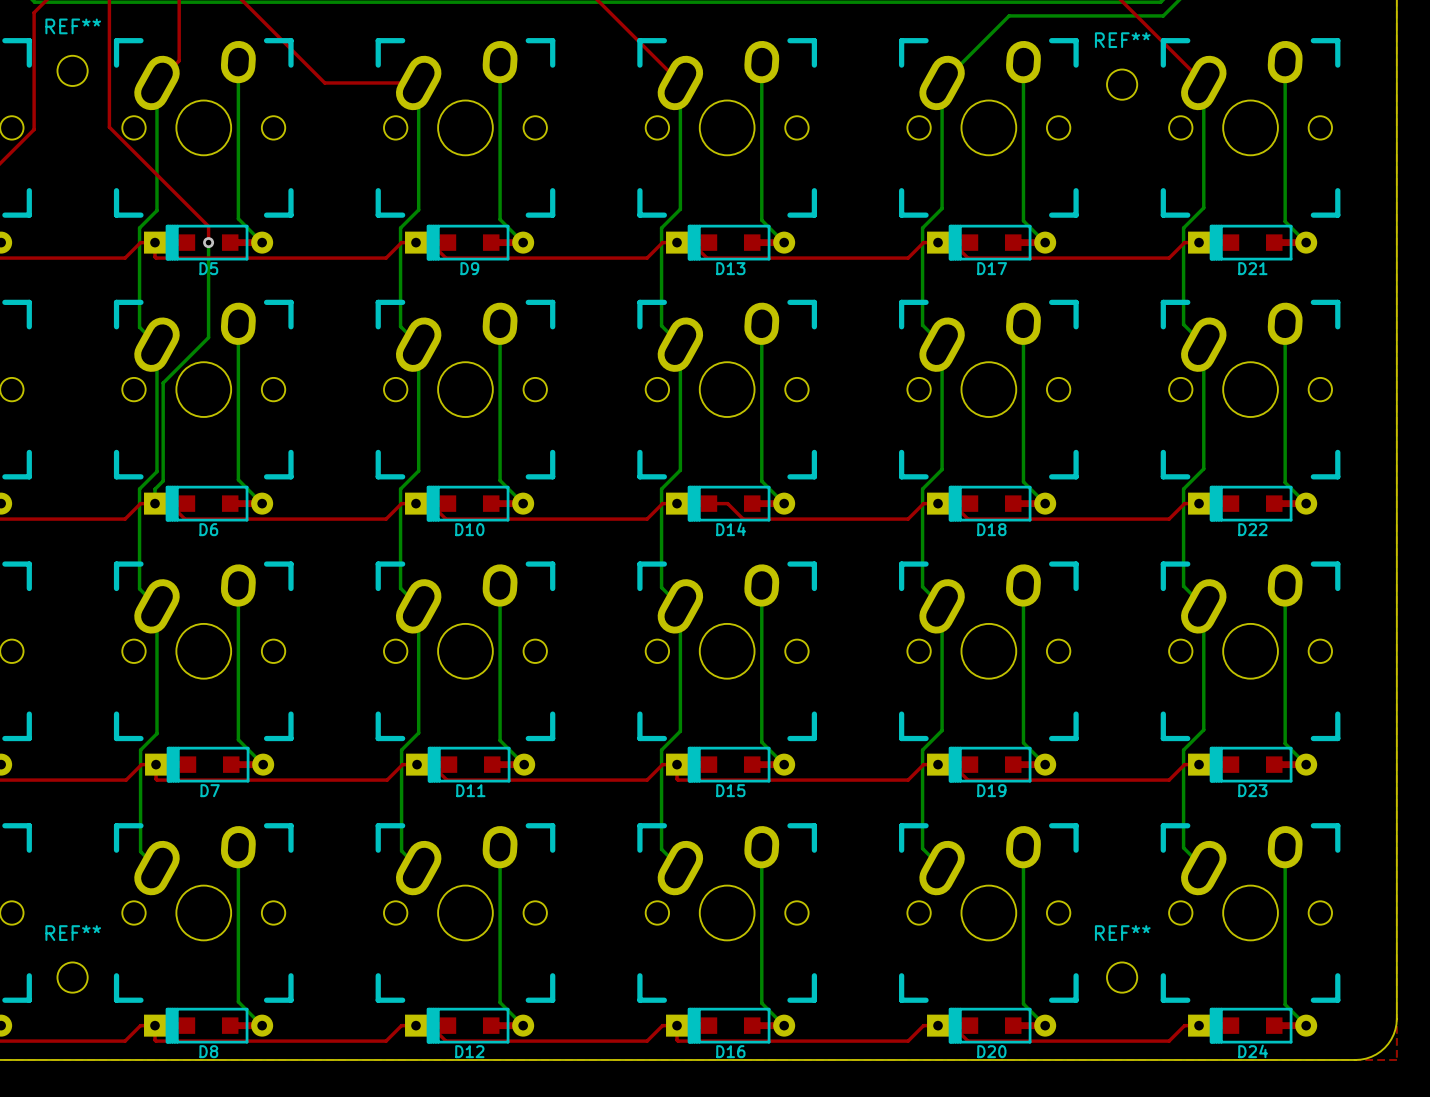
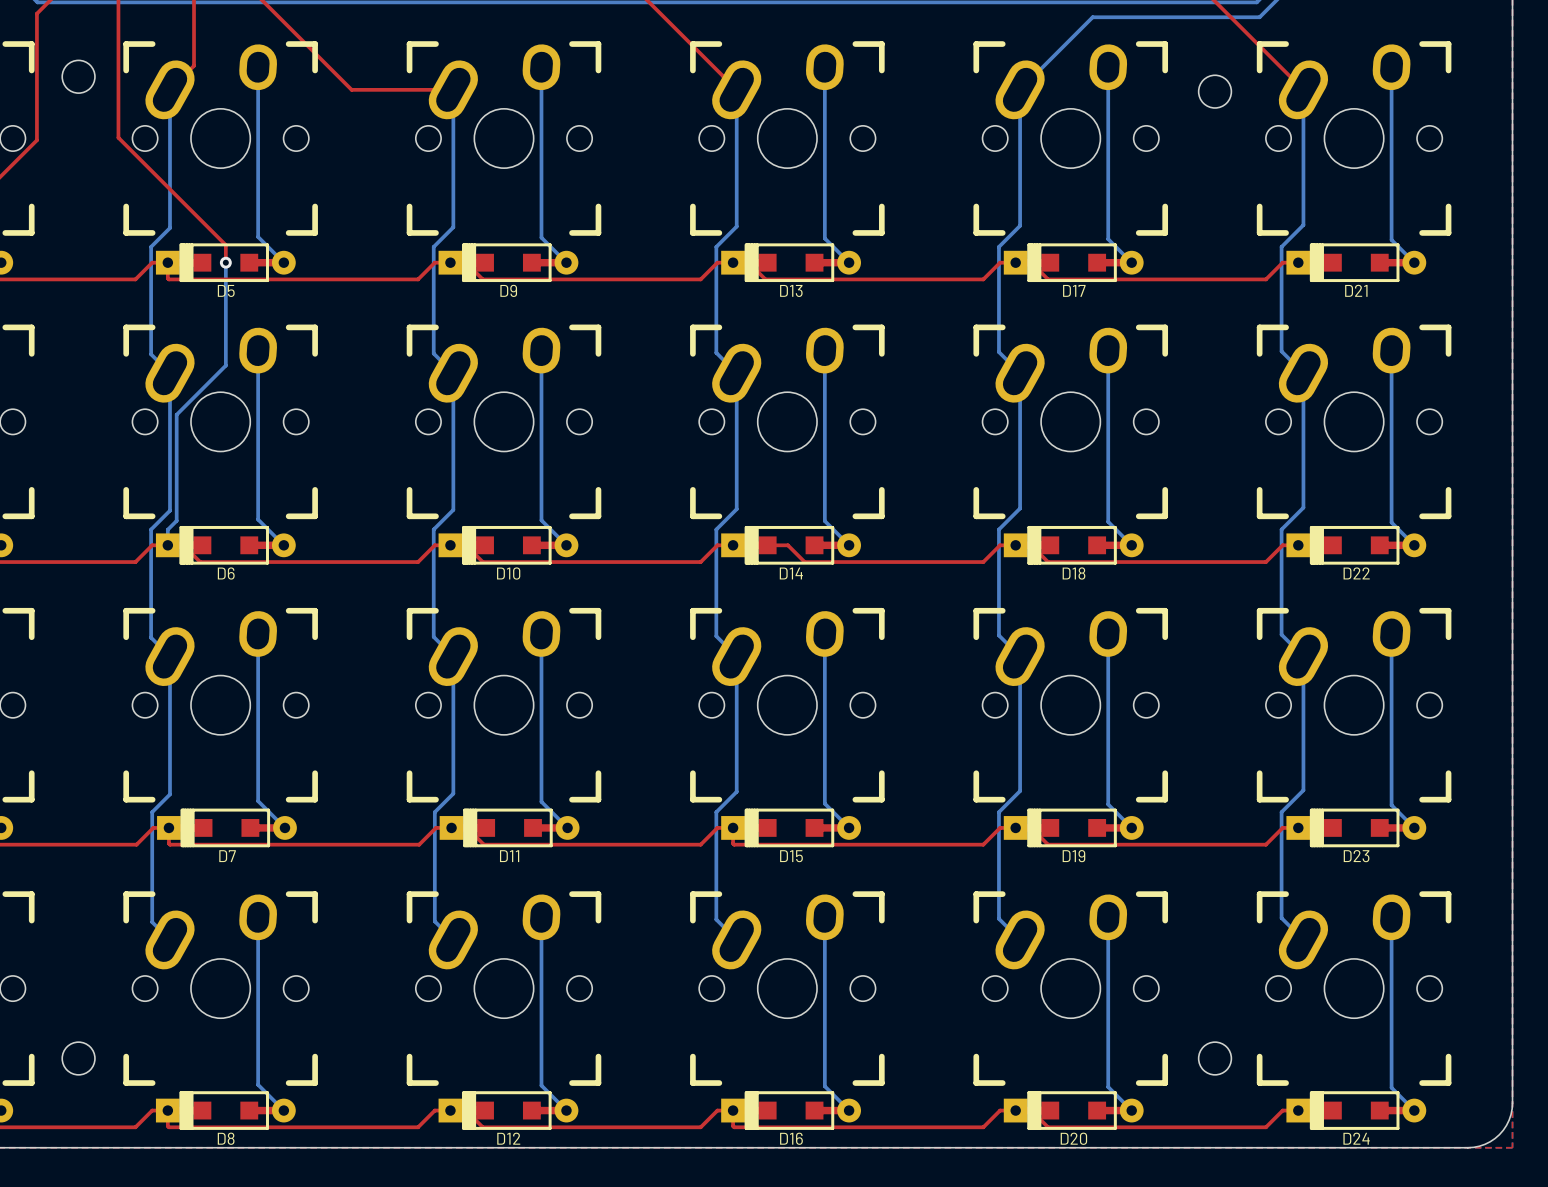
REF** name: REF** (73, 26) -> none
REF** name: REF** (1122, 40) -> none
REF** name: REF** (73, 933) -> none
REF** name: REF** (1122, 933) -> none

